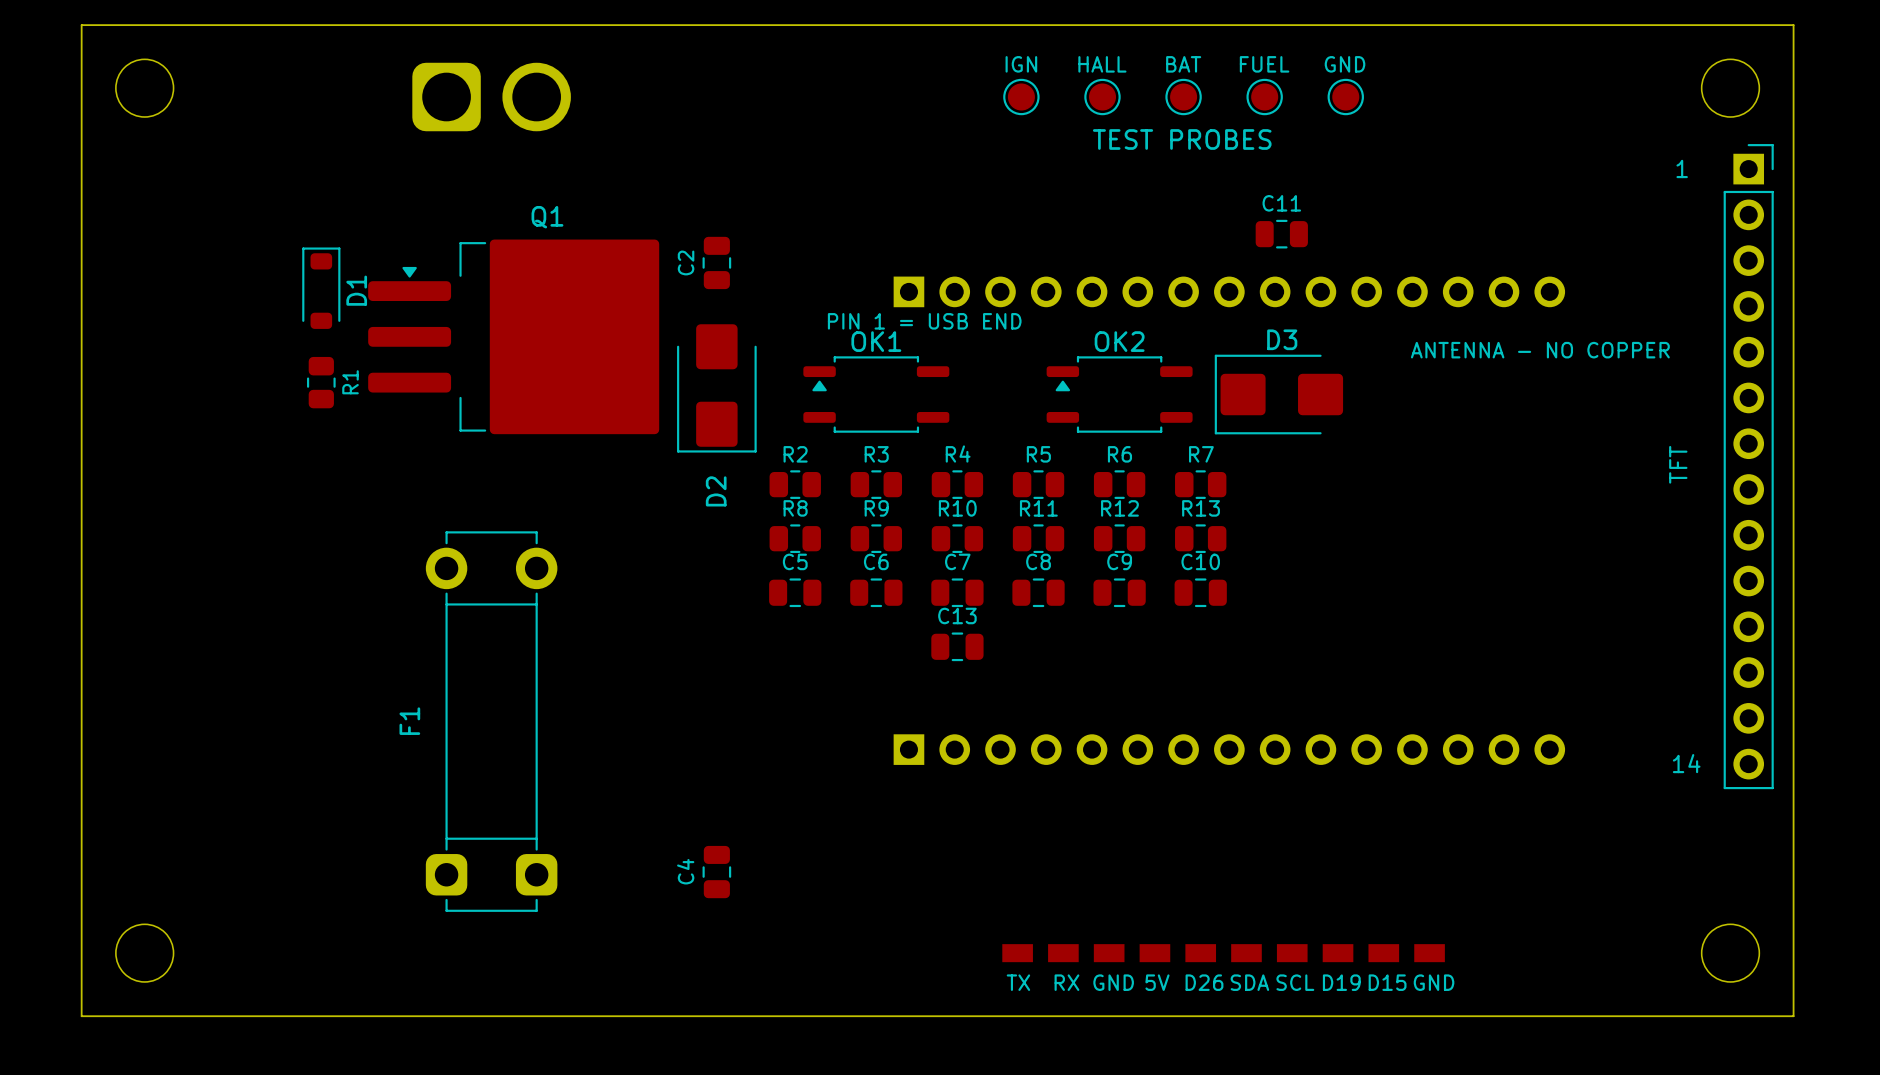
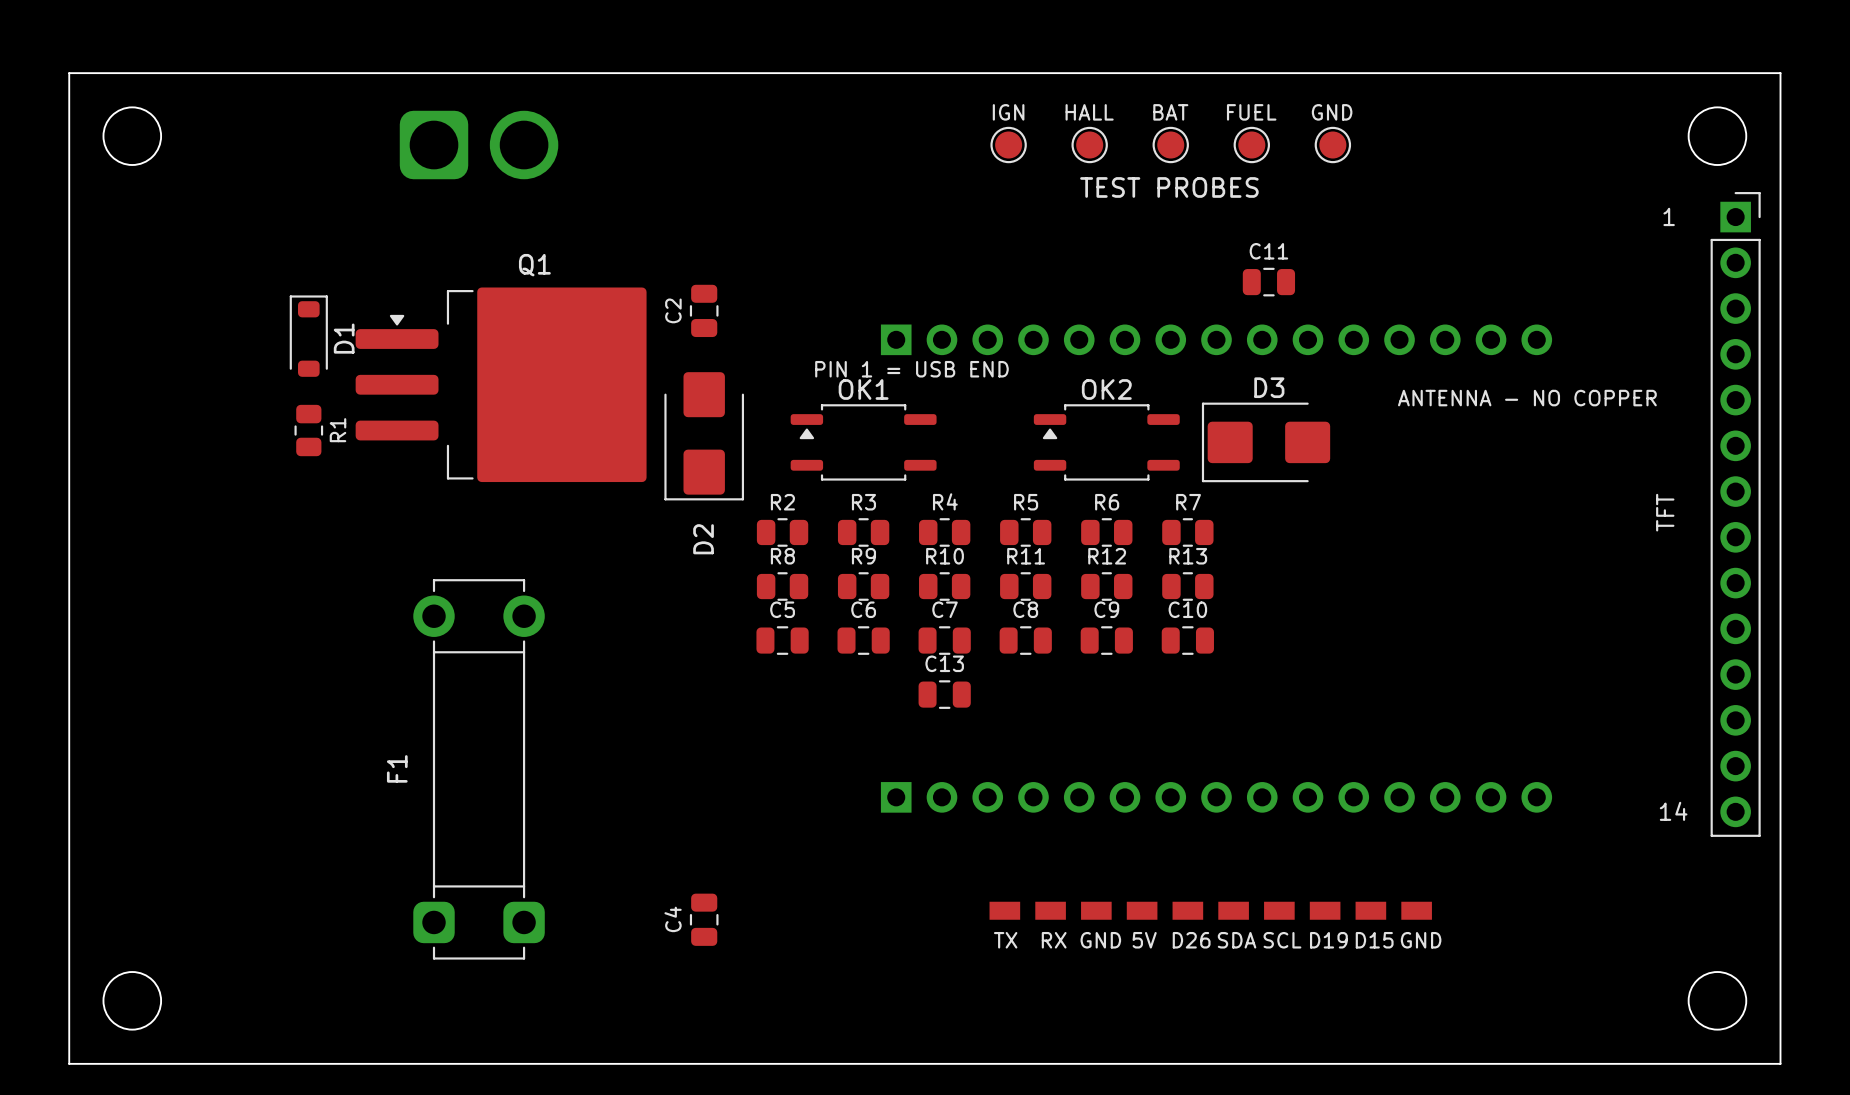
part position: (1086, 953) -> (1073, 910)
part position: (1315, 953) -> (1302, 910)
text position: TX (1018, 982) -> TX (1005, 940)
text position: RX (1066, 982) -> RX (1054, 940)
text position: GND (1113, 982) -> GND (1100, 940)
text position: 5V (1157, 982) -> 5V (1144, 940)
text position: D26 (1204, 982) -> D26 (1191, 940)
text position: SDA (1249, 982) -> SDA (1237, 940)
text position: SCL (1295, 982) -> SCL (1282, 940)
text position: D19 (1341, 982) -> D19 (1328, 940)
text position: D15 (1387, 982) -> D15 (1374, 940)
text position: GND (1434, 982) -> GND (1421, 940)

